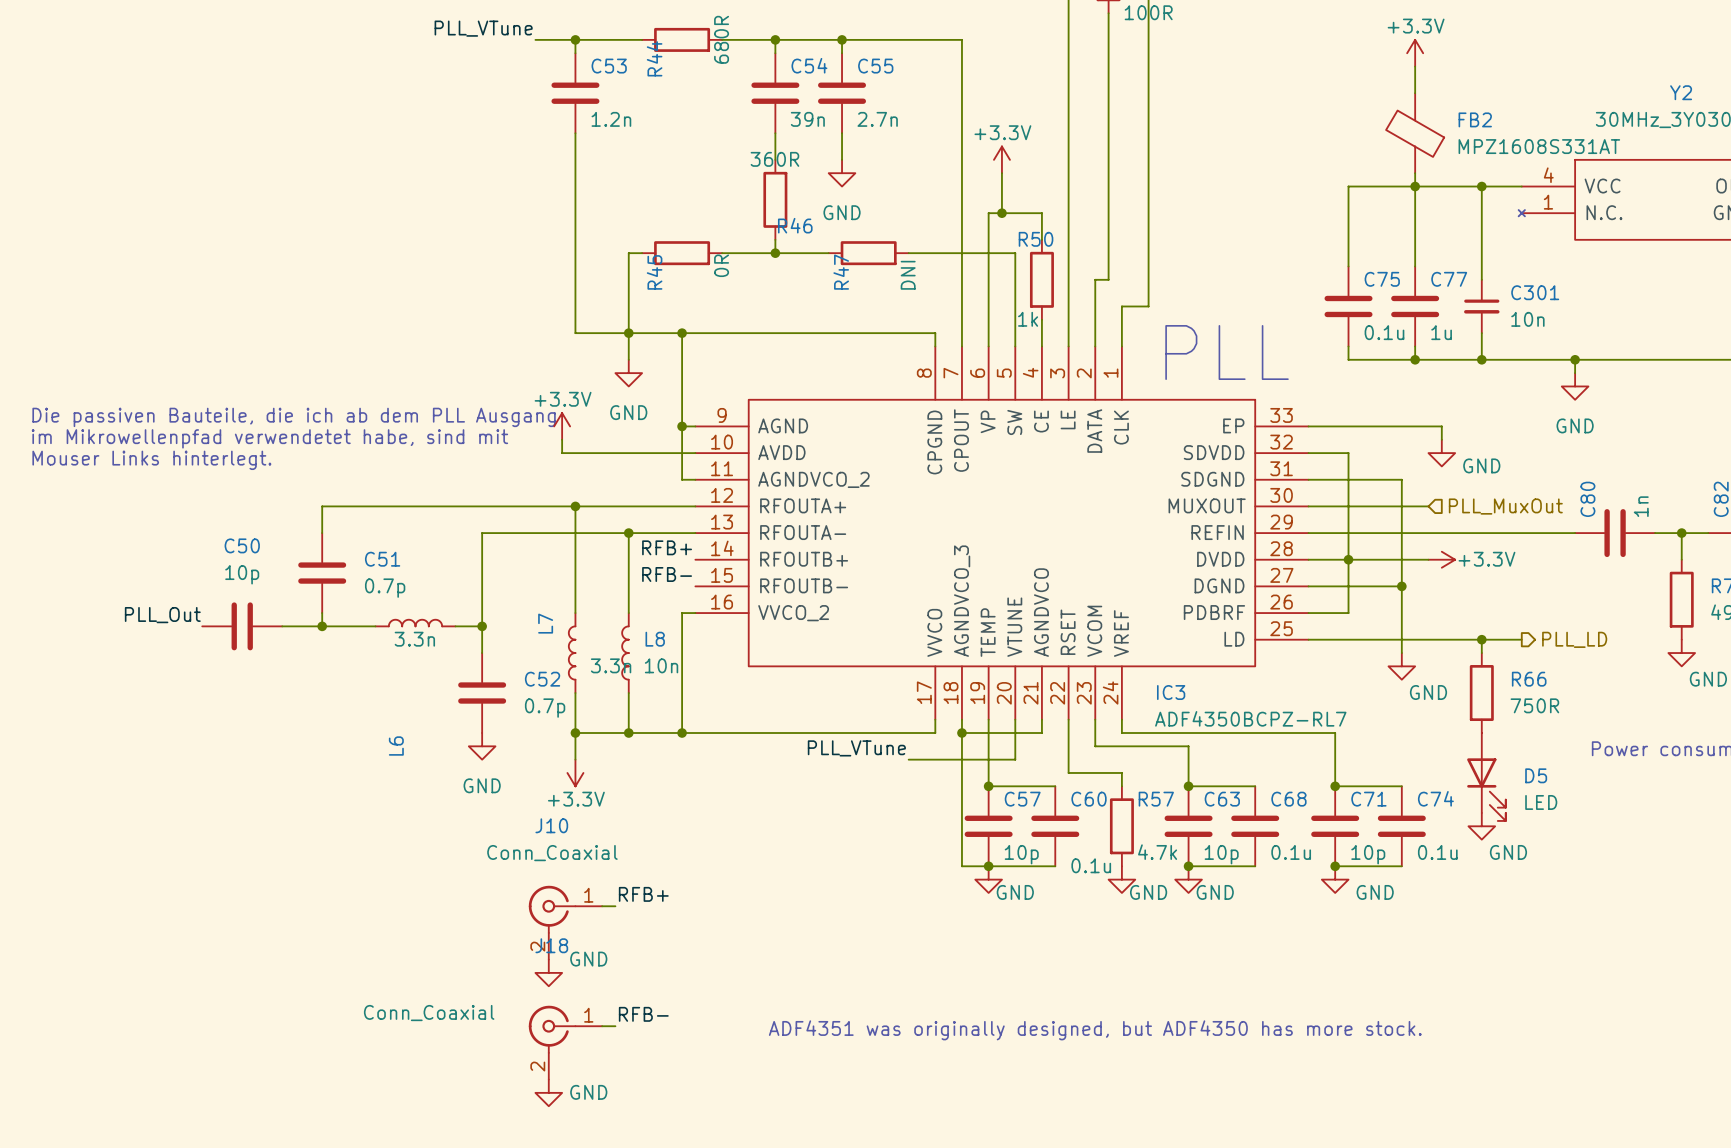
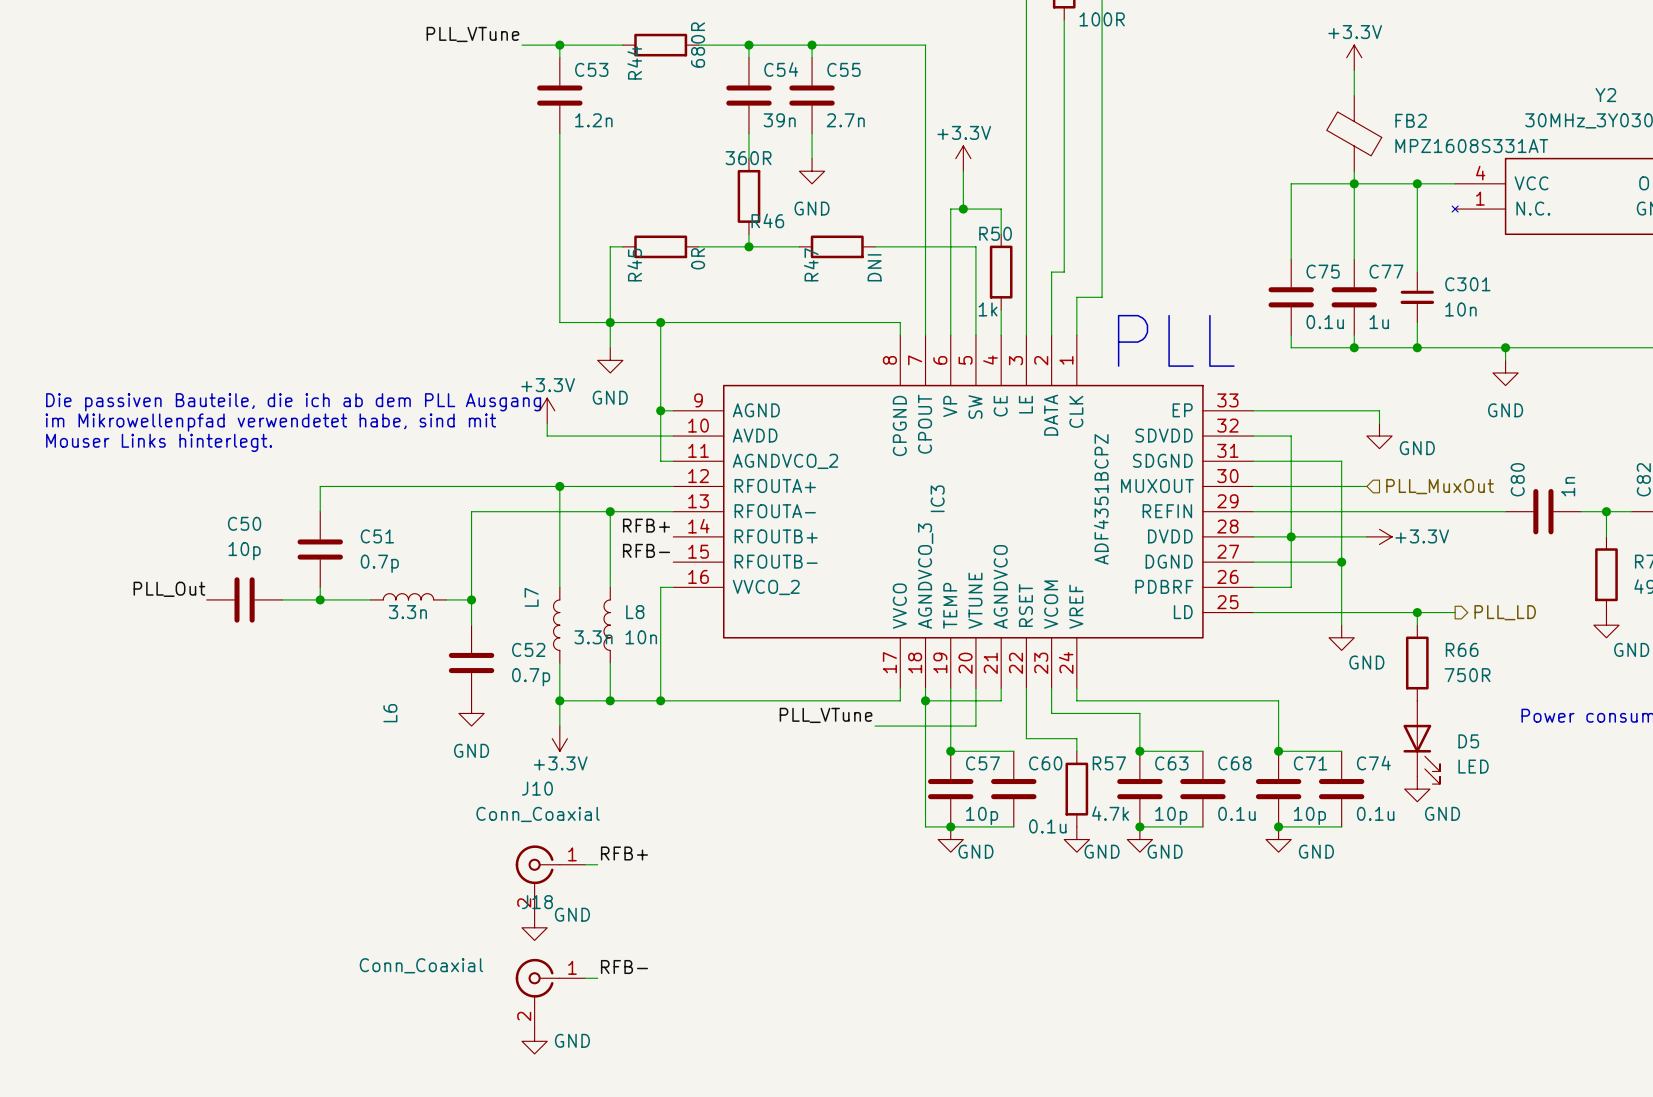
IC3 name rotation: 0° (1171, 692) -> 90° counterclockwise (937, 498)
IC3 name position: IC3 (1171, 692) -> IC3 (937, 498)
IC3 value: ADF4350BCPZ-RL7 (1250, 718) -> ADF4351BCPZ (1101, 499)
text: ADF4351 was originally designed, but ADF4350 has more stock. (1095, 1030) -> none

